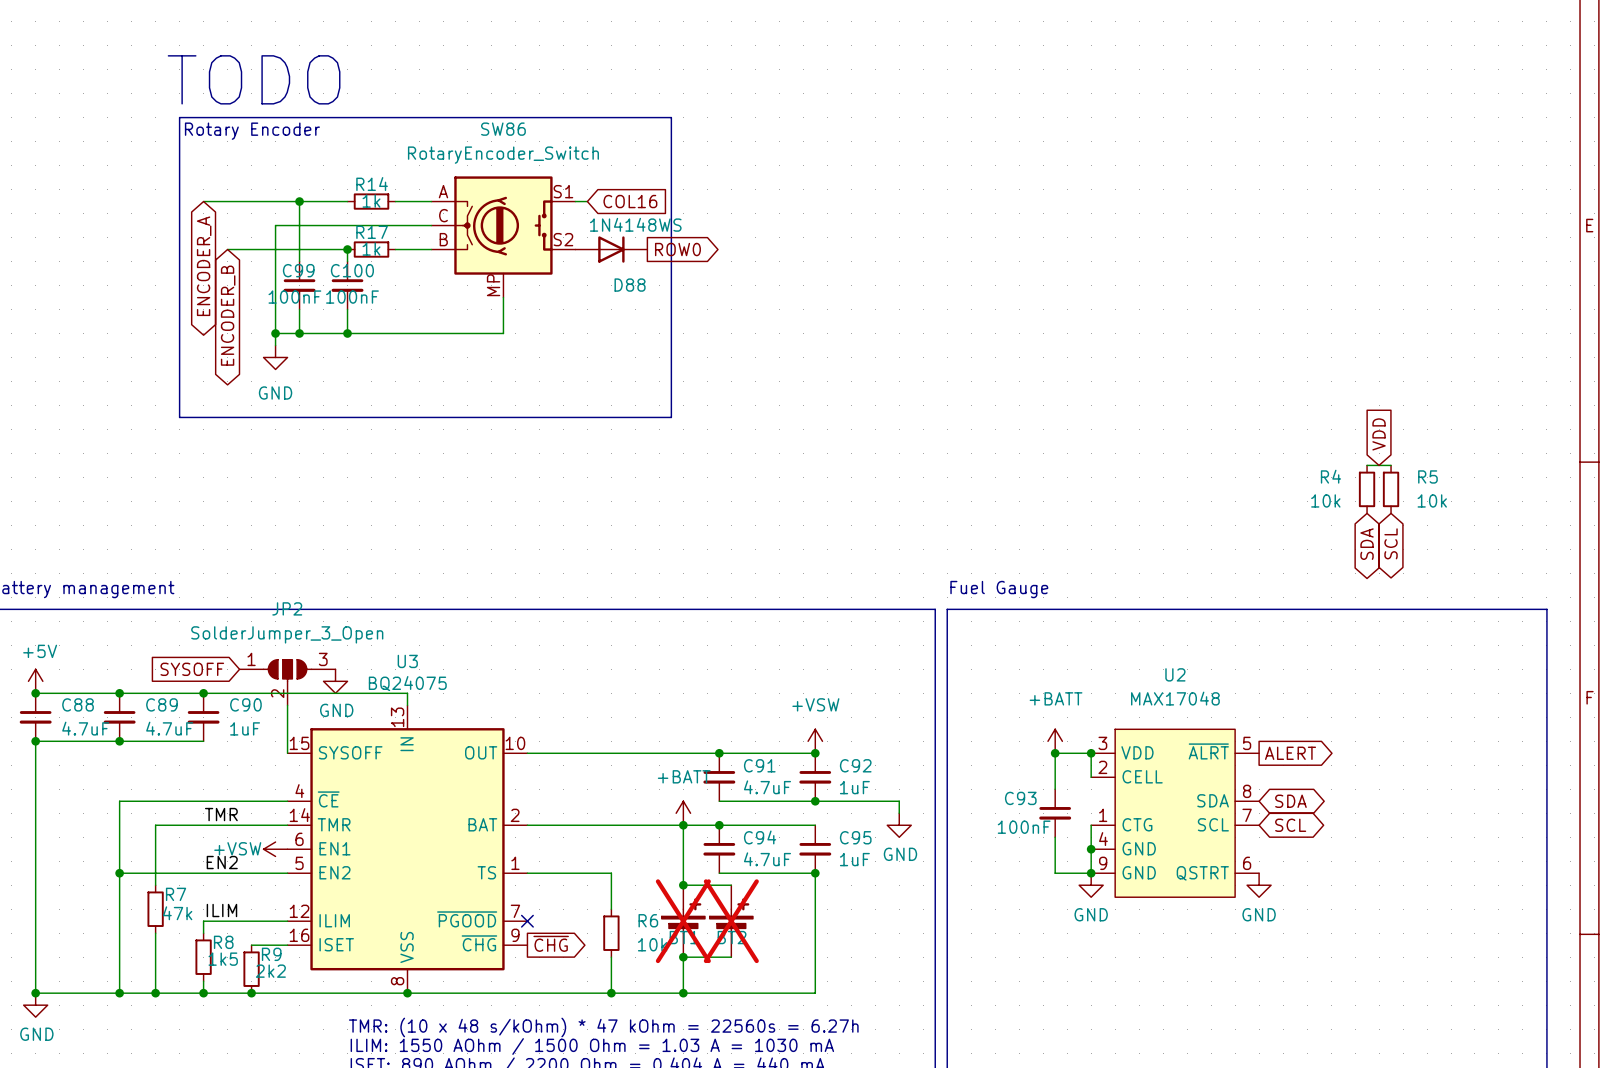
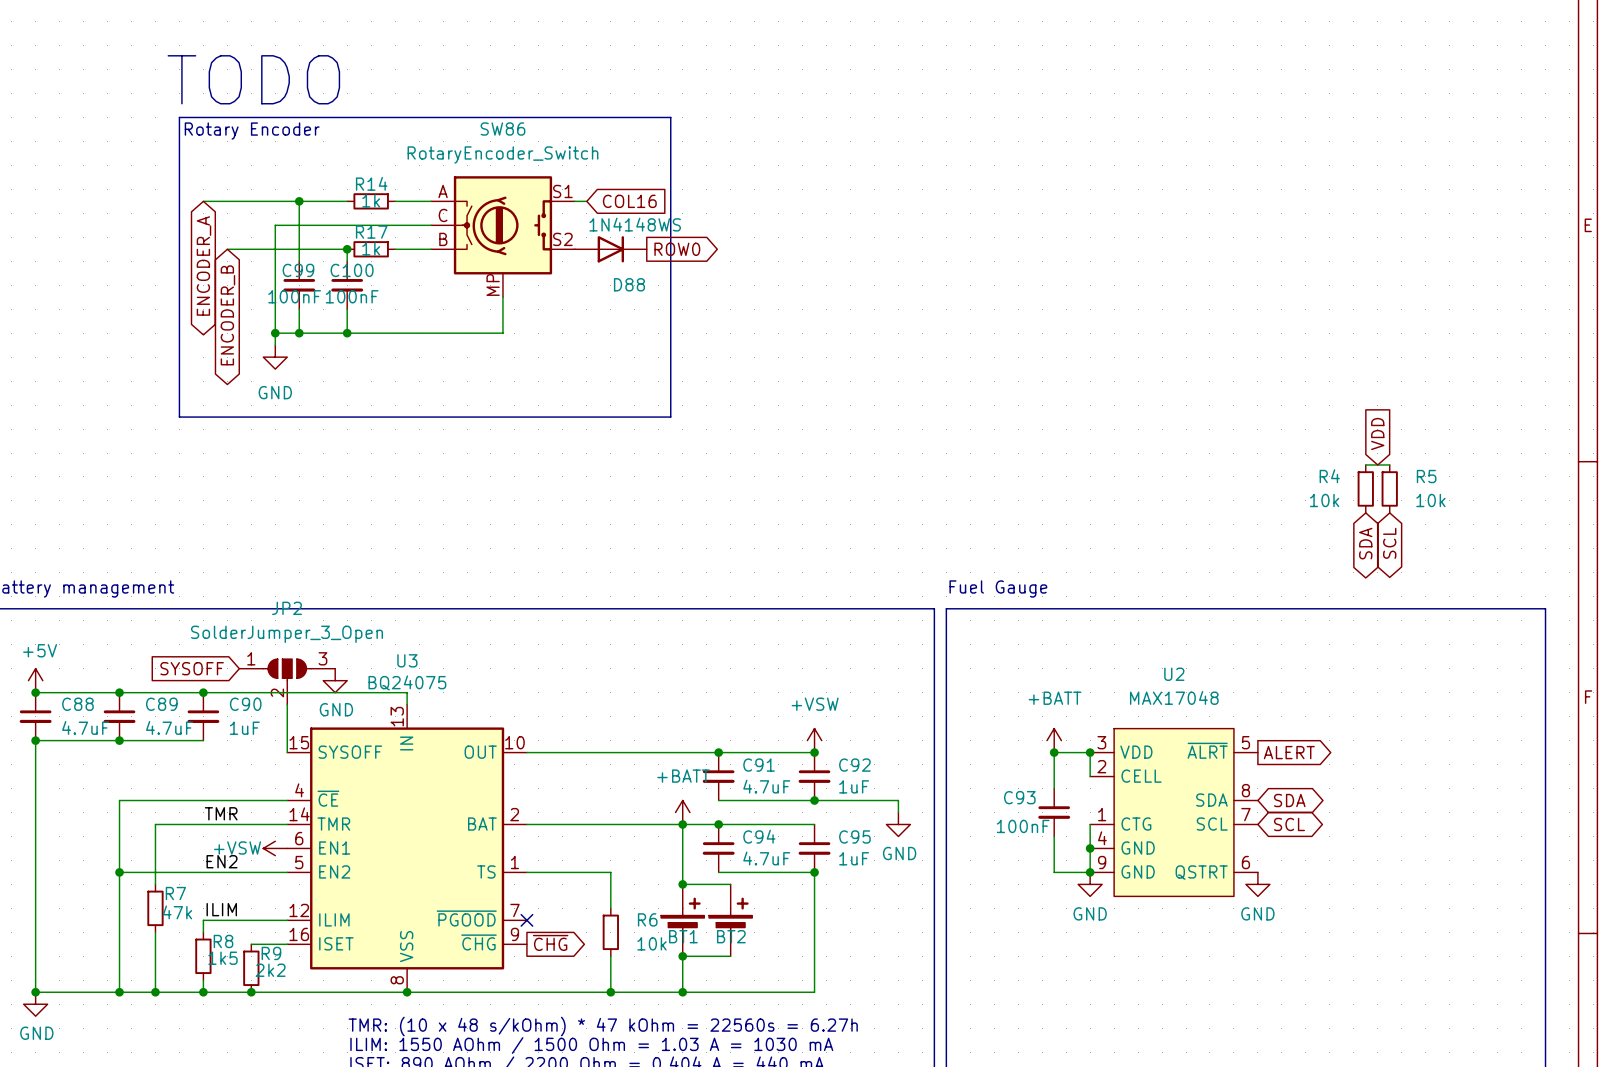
BT1 do-not-place cross: (683, 921) -> none
BT2 do-not-place cross: (731, 921) -> none

